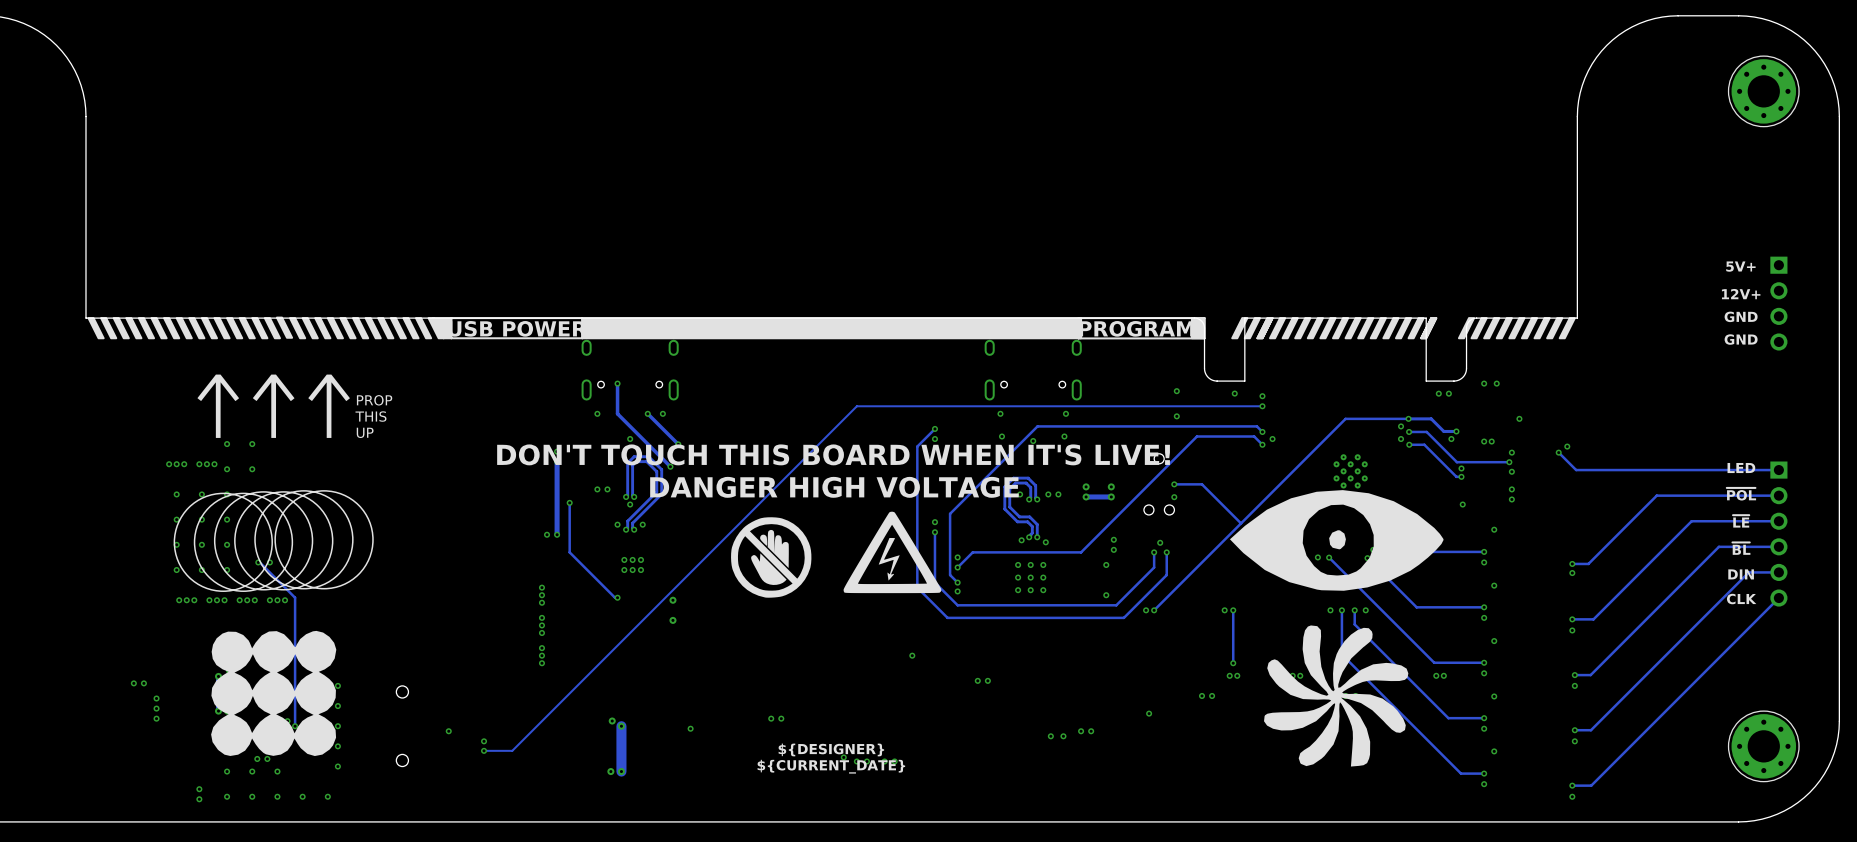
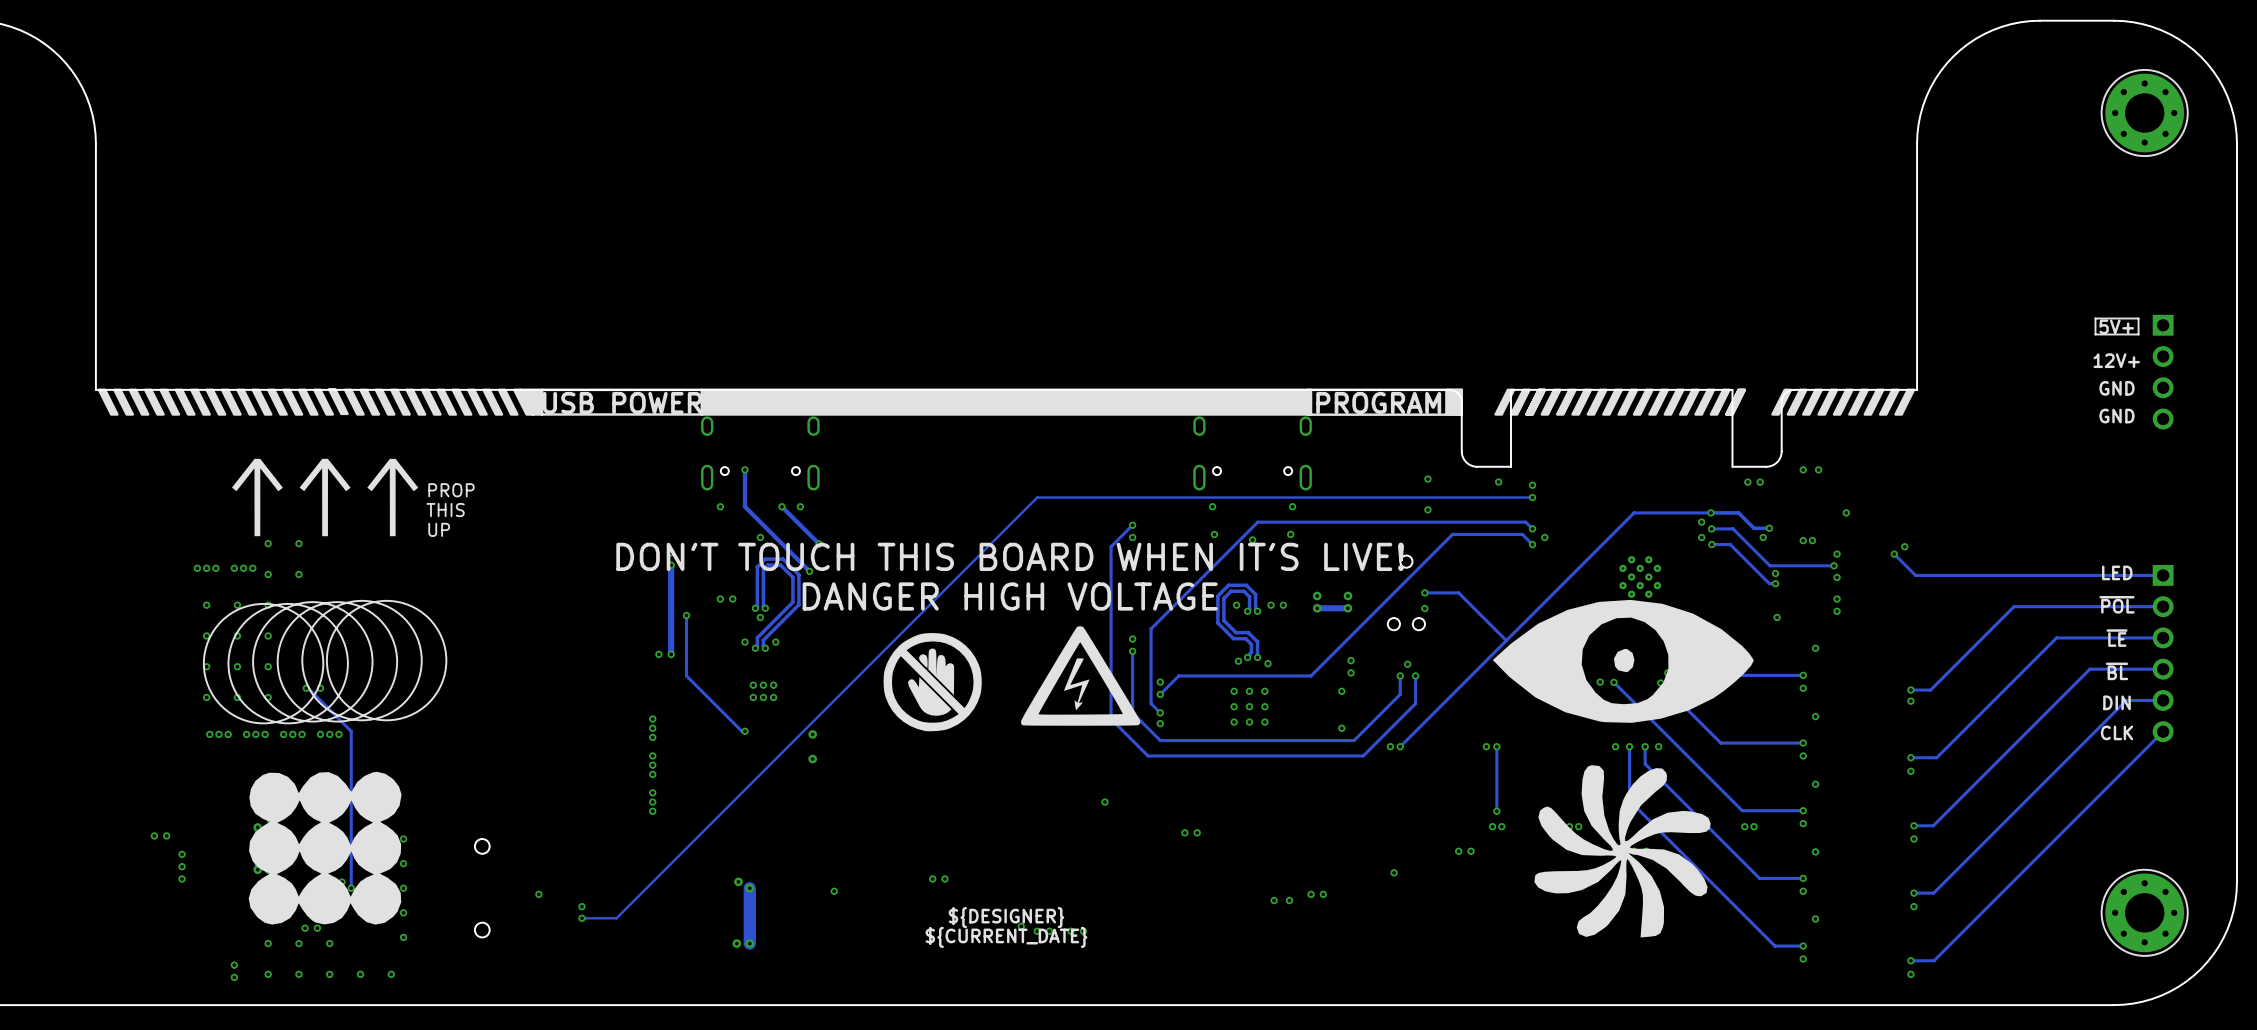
line: none -> (2138, 318) (2095, 318) (2095, 334) (2138, 334) (2138, 318)

